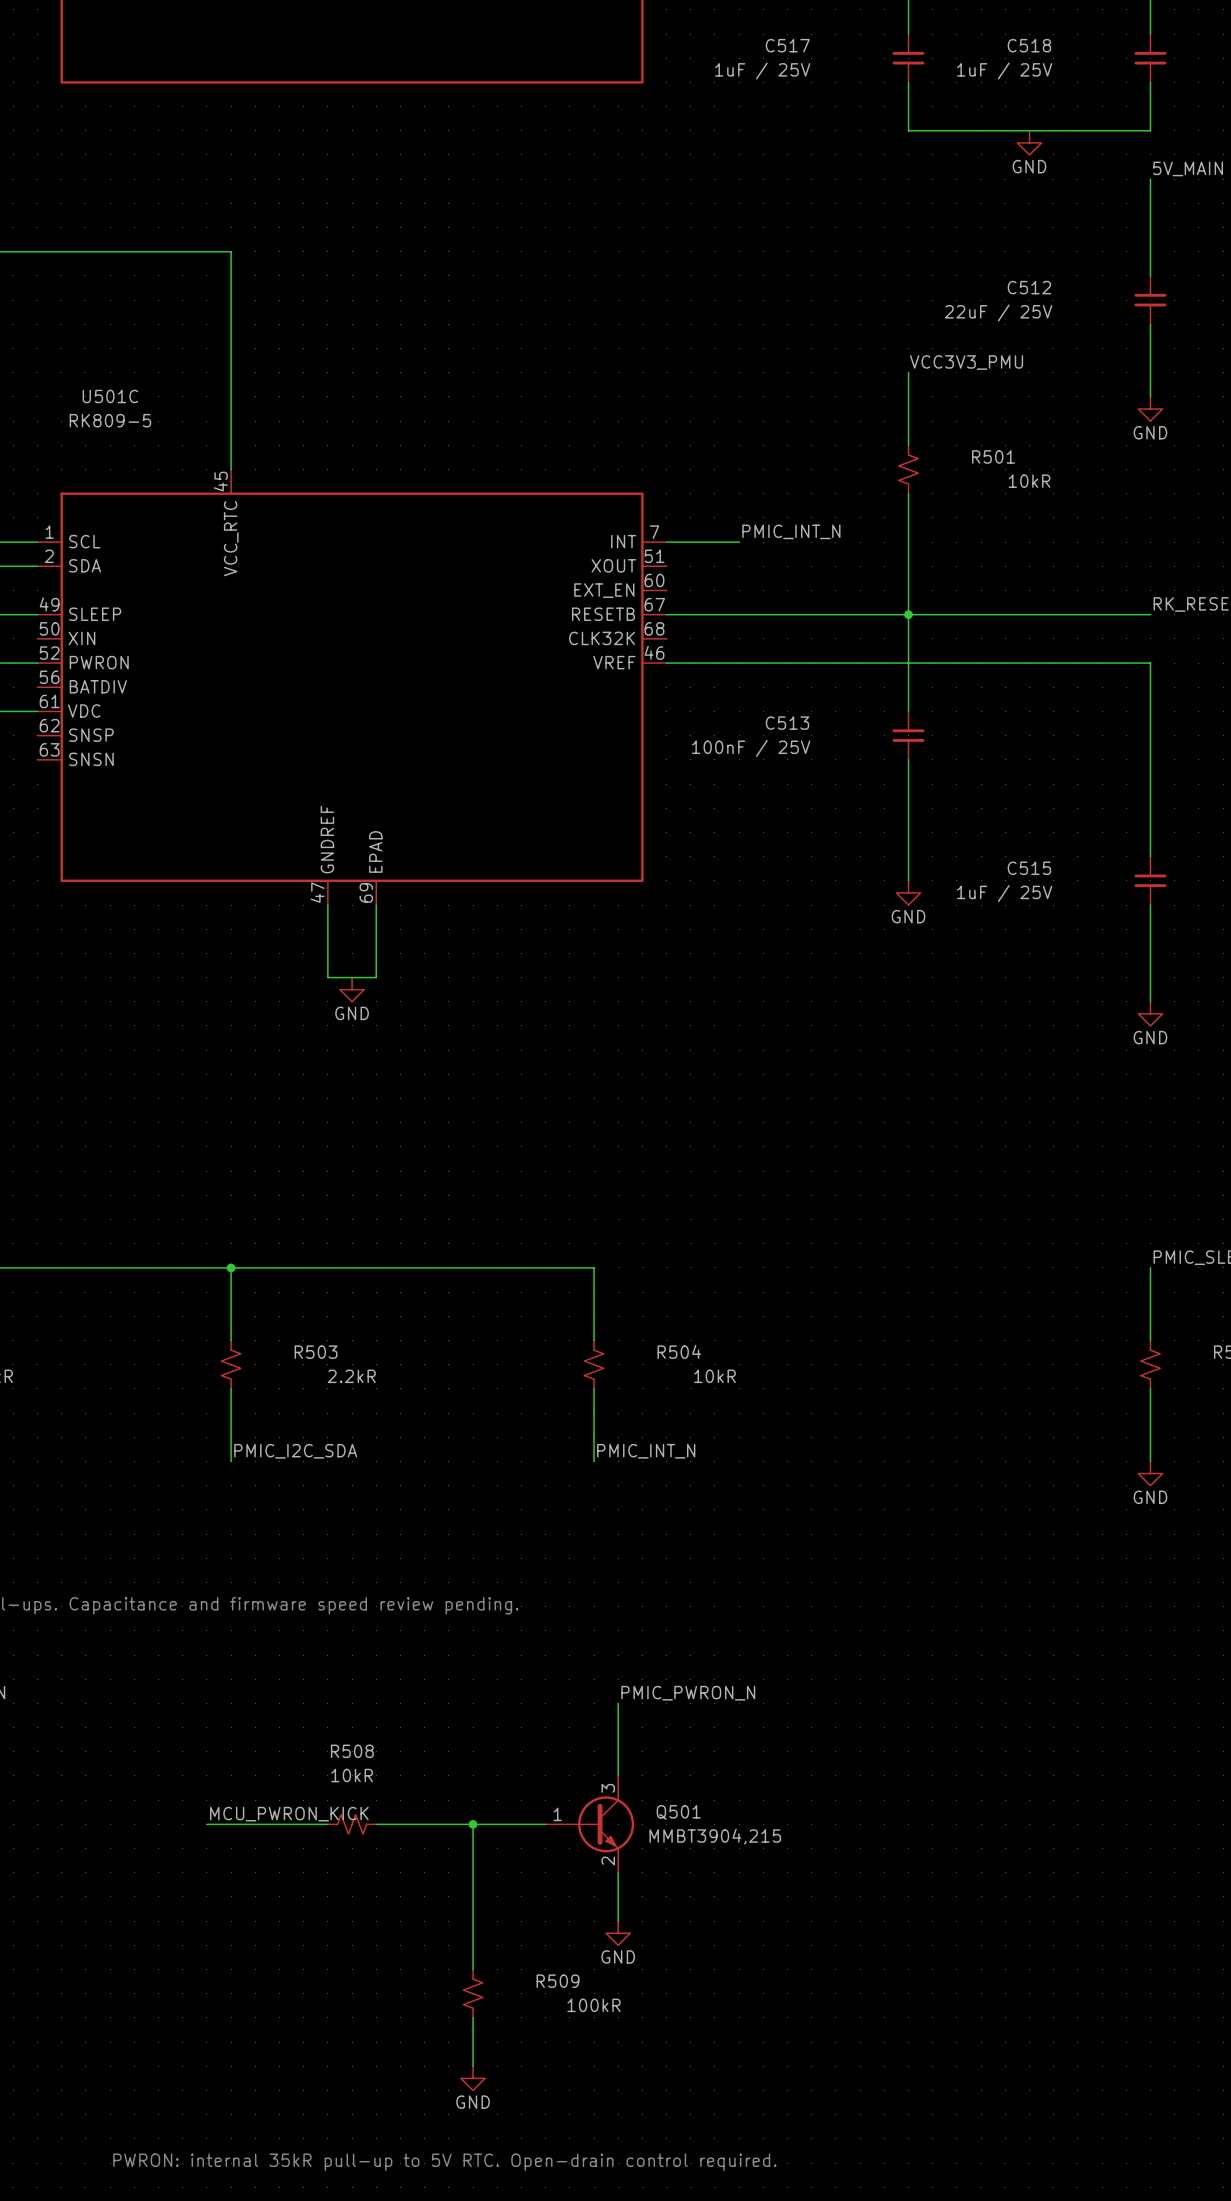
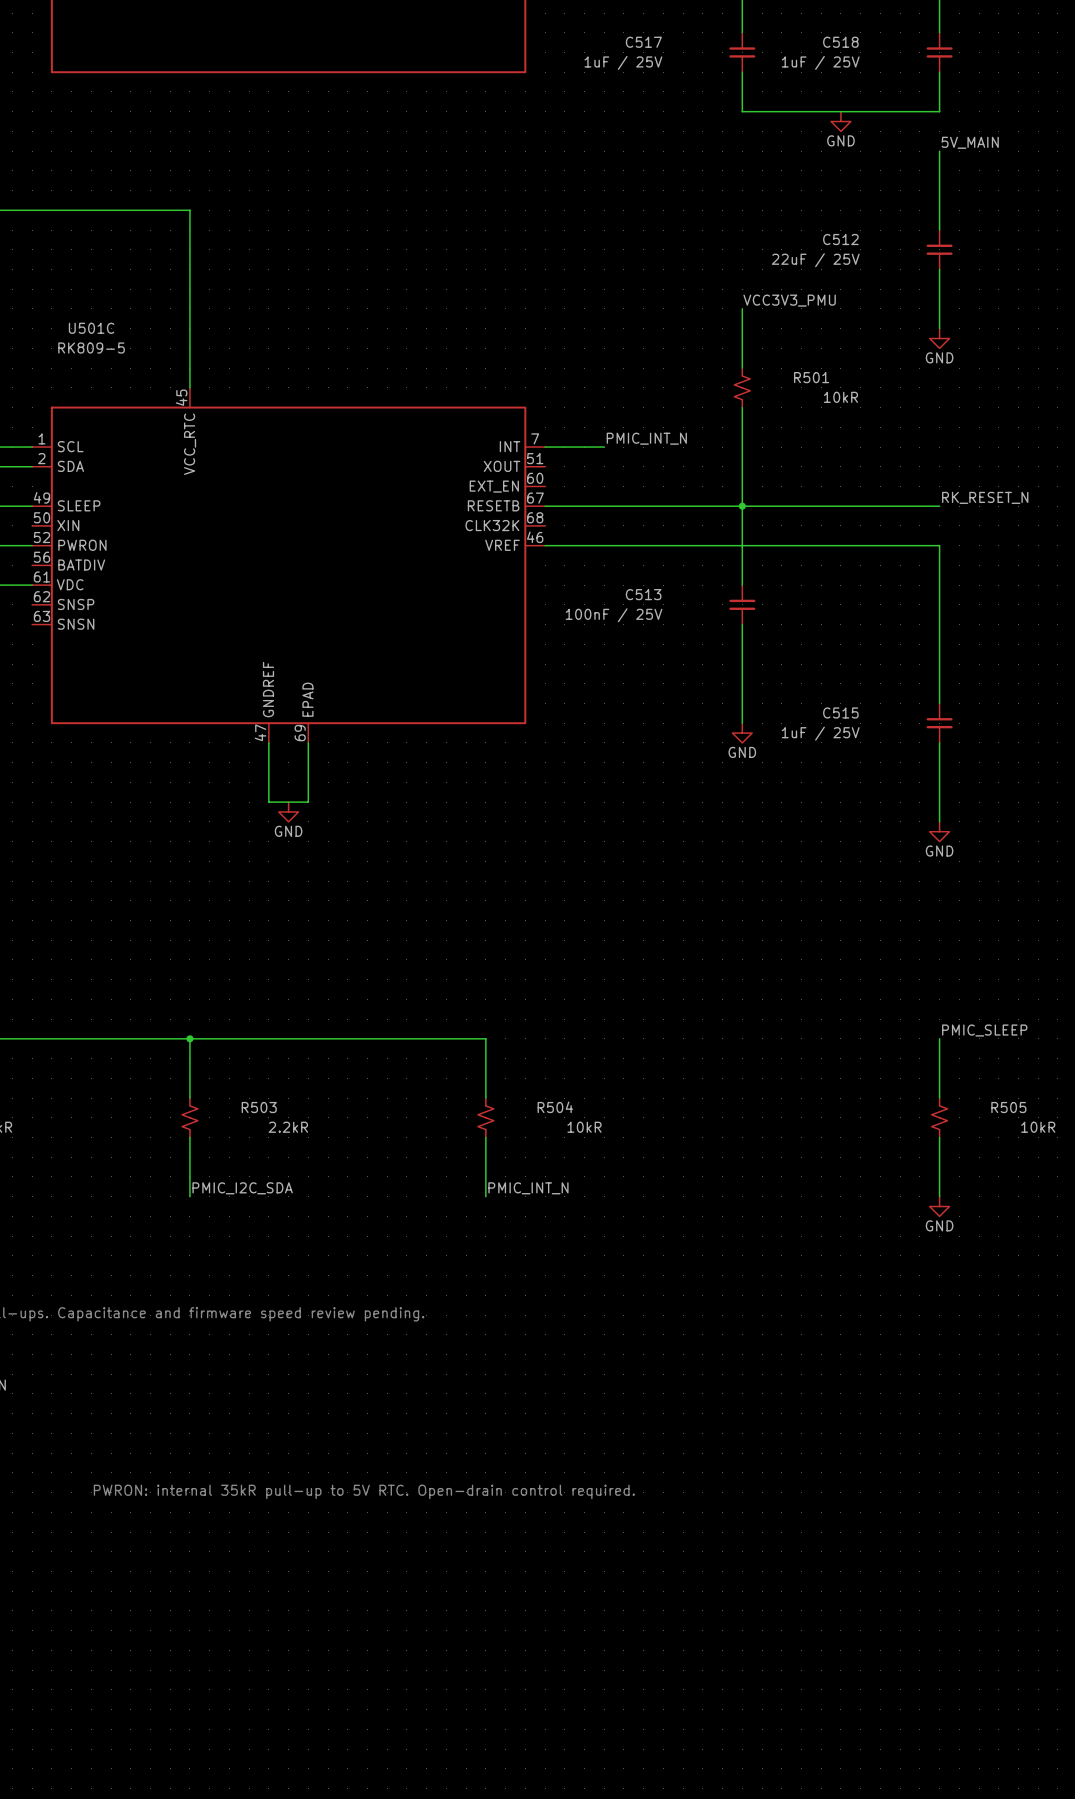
label: PMIC_PWRON_N (688, 1693) -> none
wire: (618, 1703) (618, 1775) -> none
label: MCU_PWRON_KICK (289, 1814) -> none
text: none -> PWRON: internal 35kR pull-up to 5V RTC. Open-drain control required. (364, 1491)
wire: (206, 1824) (327, 1824) -> none
R508: 10kR (352, 1824) -> none
wire: (376, 1824) (545, 1824) -> none
wire: (473, 1824) (473, 1969) -> none
junction: (473, 1824) -> none
Q501: MMBT3904,215 (589, 1824) -> none
wire: (618, 1872) (618, 1921) -> none
power symbol: GND (618, 1933) -> none
R509: 100kR (473, 1993) -> none
wire: (473, 2017) (473, 2066) -> none
power symbol: GND (473, 2078) -> none
text: PWRON: internal 35kR pull-up to 5V RTC. Open-drain control required. (444, 2162) -> none

